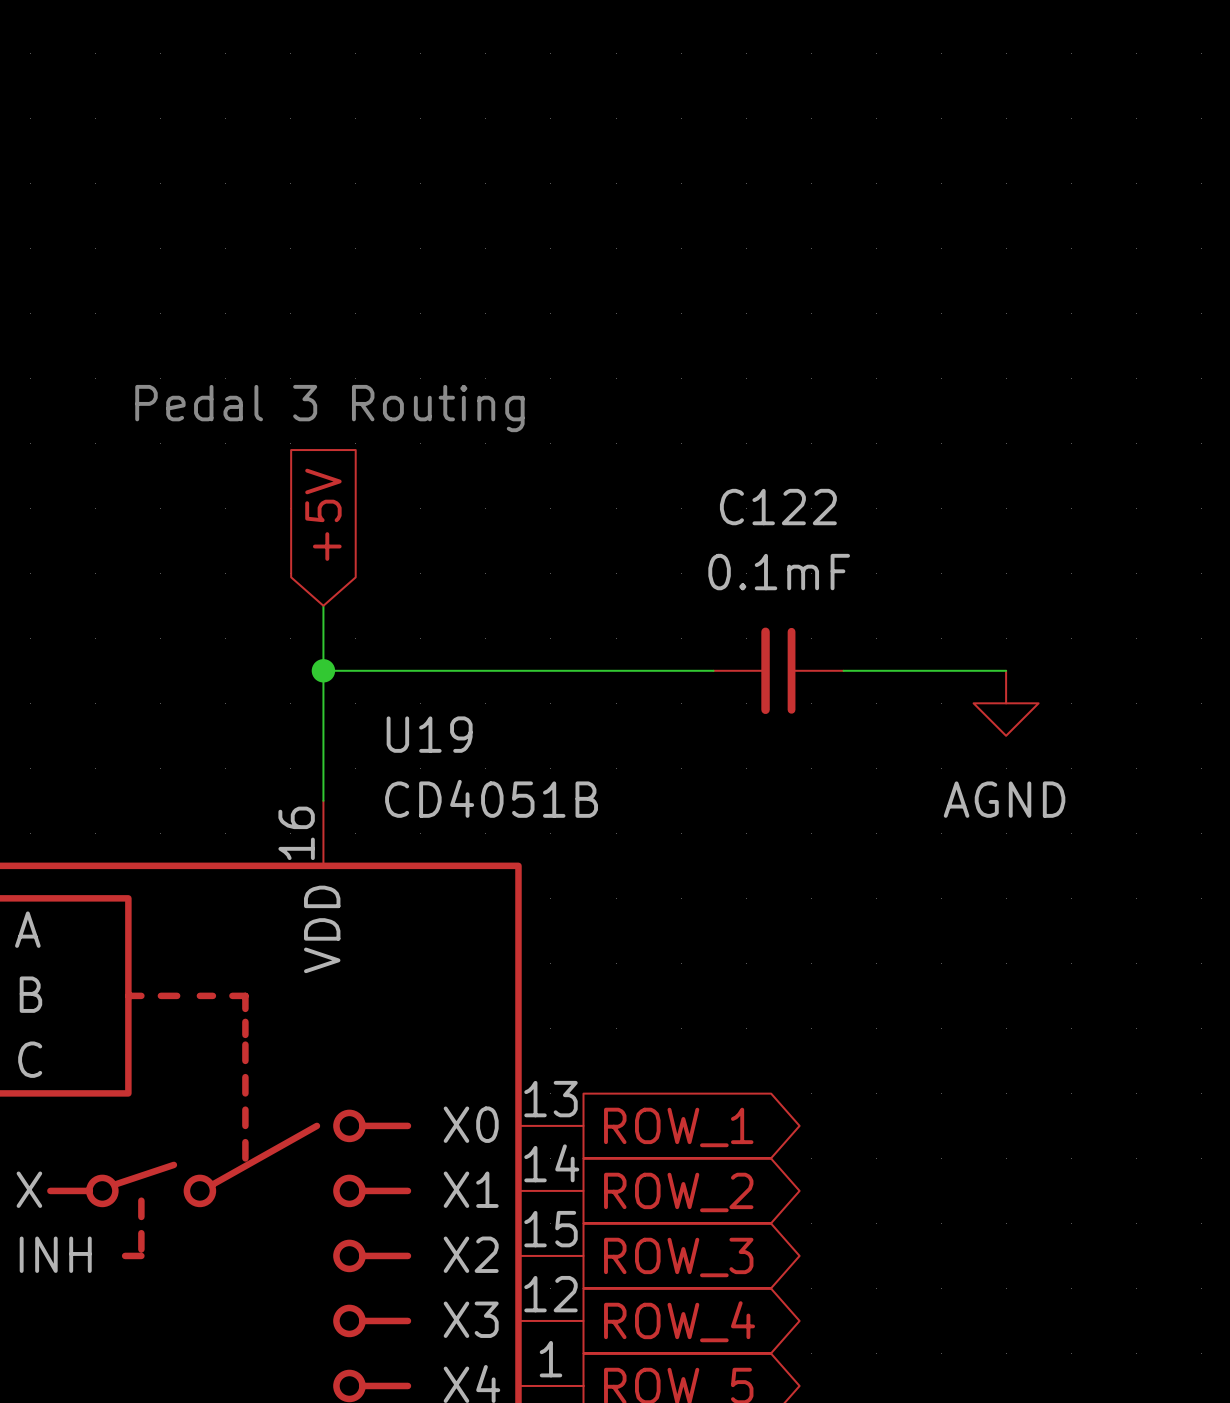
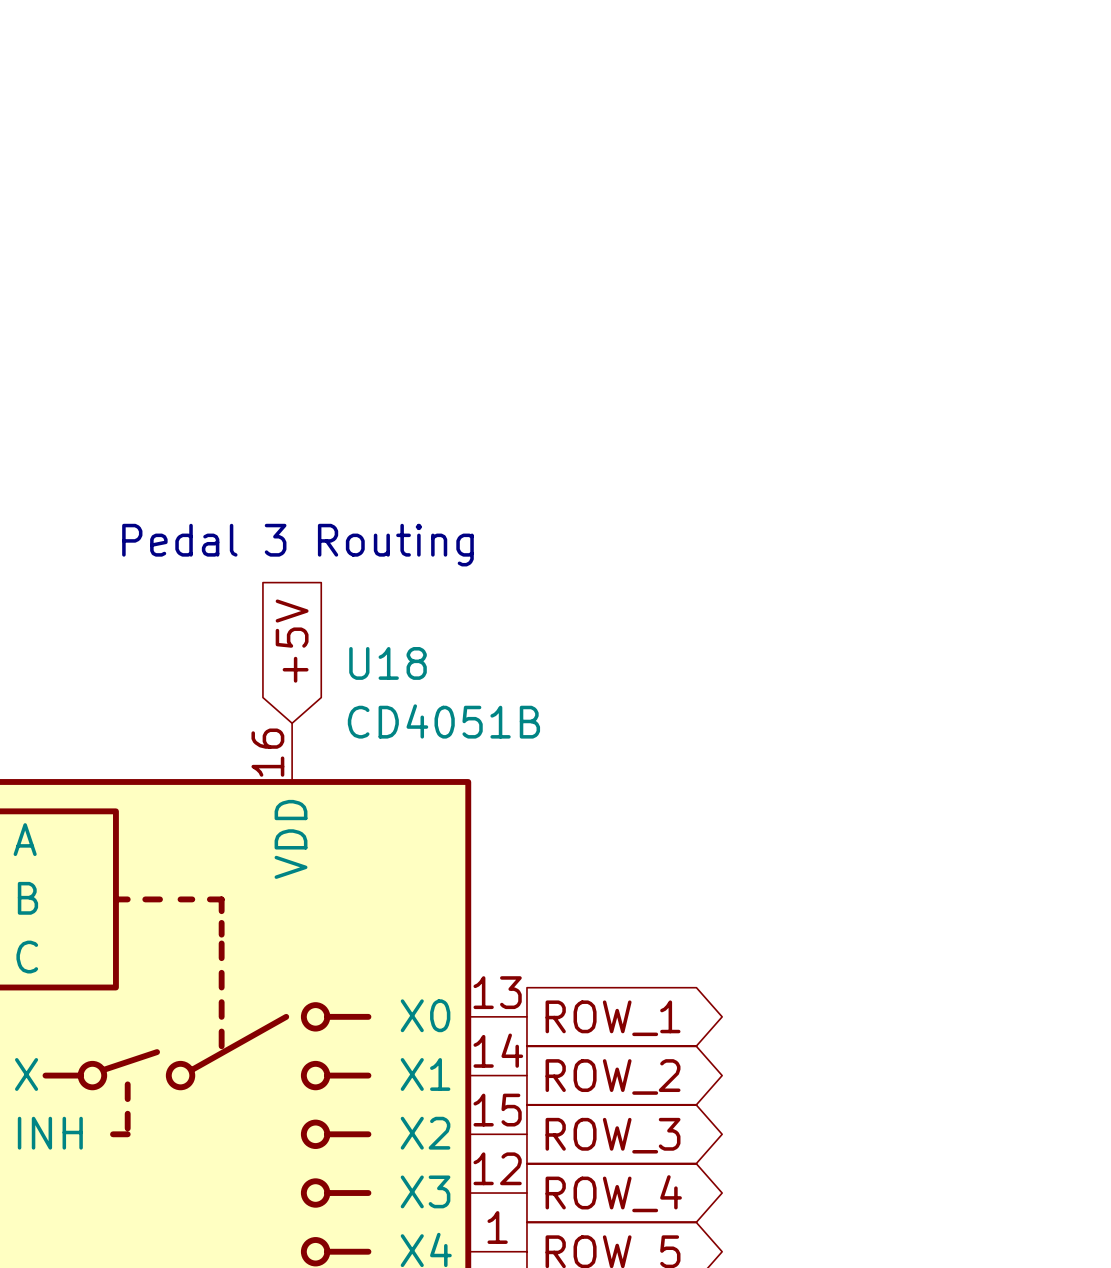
text position: Pedal 3 Routing (329, 408) -> Pedal 3 Routing (297, 545)
global label position: +5V (323, 514) -> +5V (292, 641)
wire: (323, 605) (323, 800) -> none
wire: (323, 670) (713, 670) -> none
junction: (323, 670) -> none
C122: 0.1mF (778, 670) -> none
wire: (843, 670) (1006, 670) -> none
power symbol: AGND (1006, 703) -> none
U19 name: U19 (429, 734) -> U18 (388, 663)

